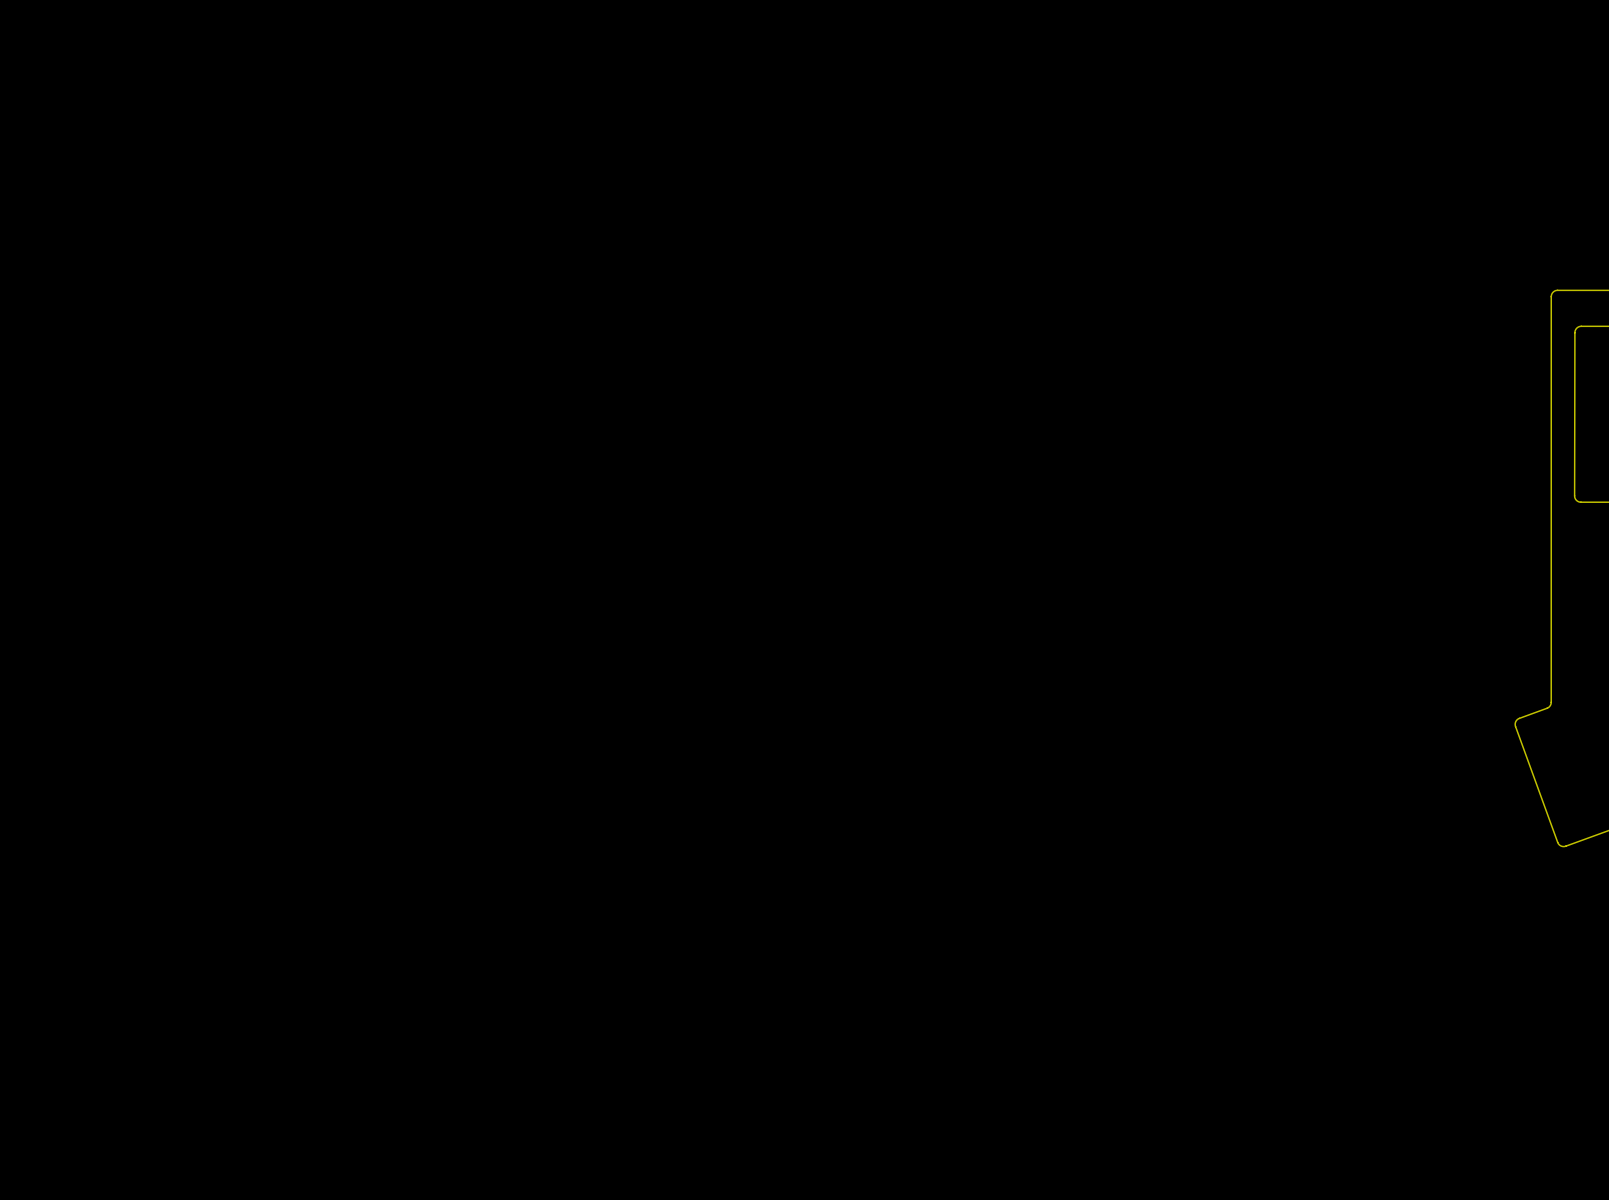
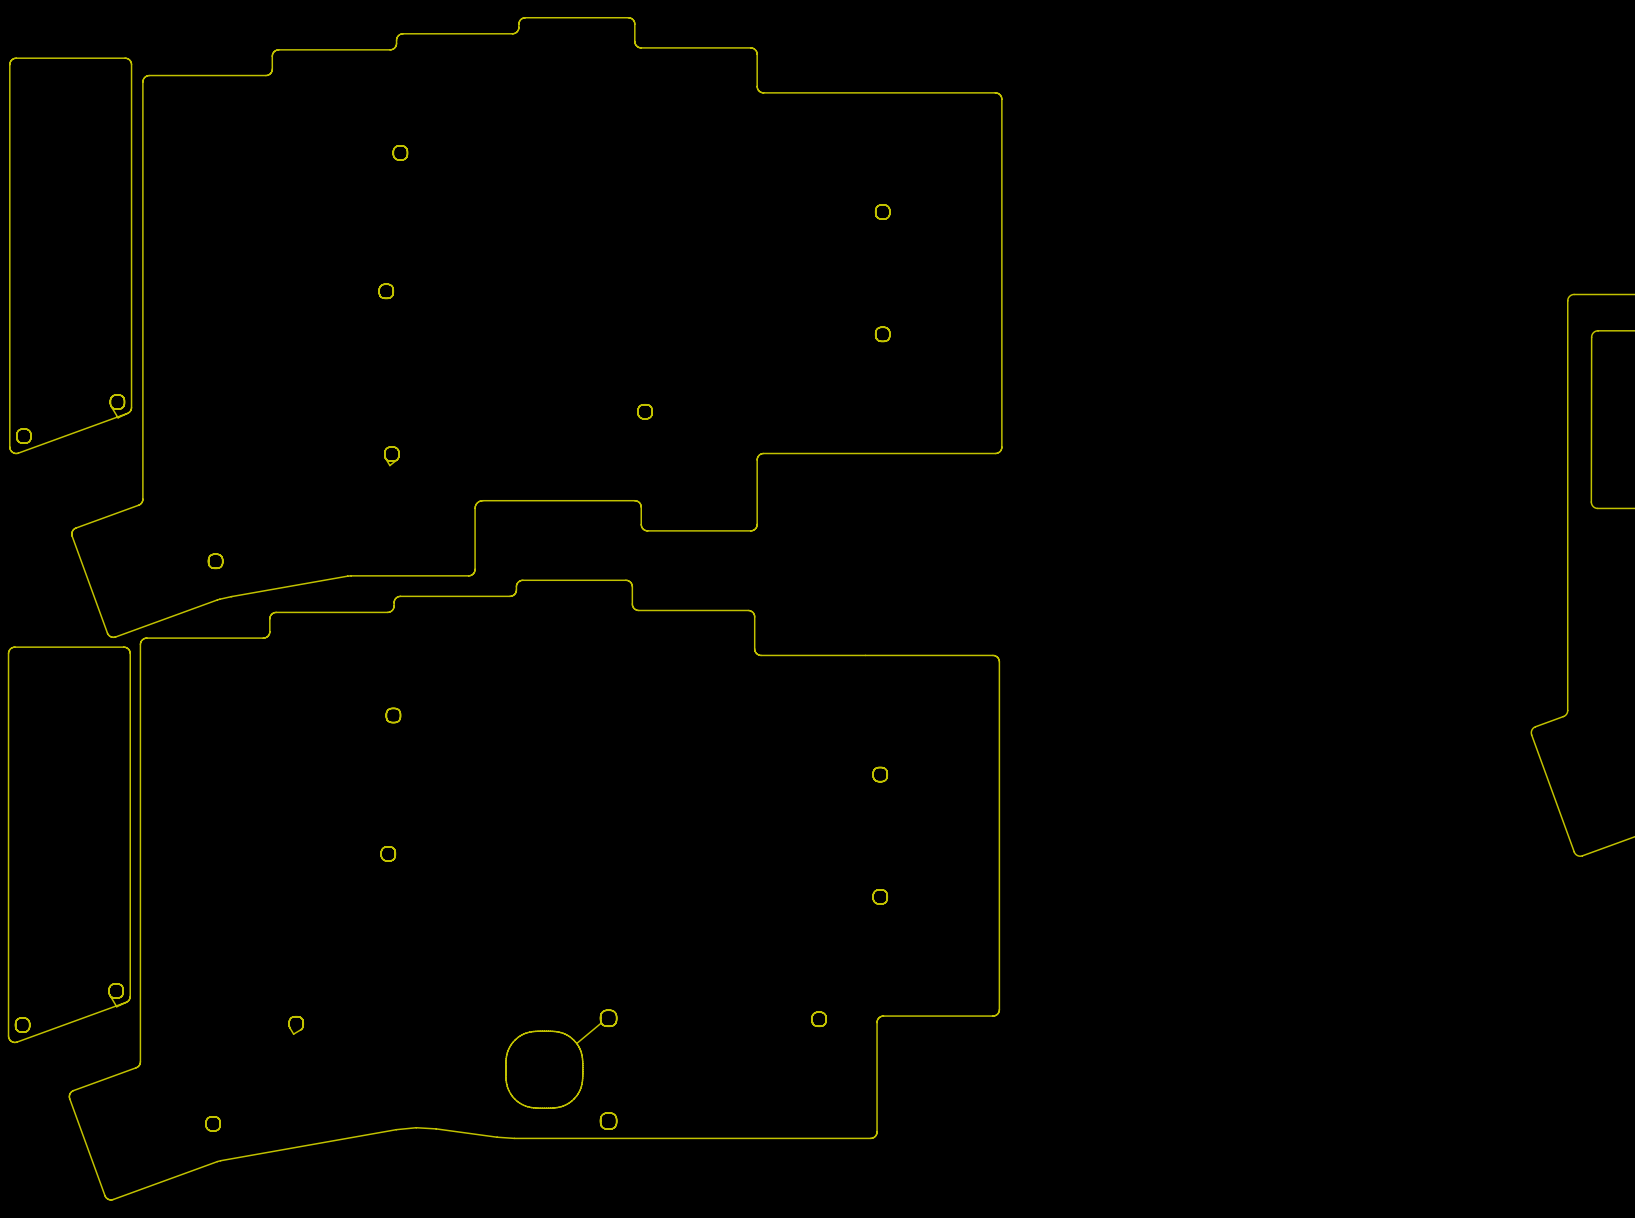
board edge: none -> (525, 17) (629, 17) (634, 21) (634, 42) (639, 47) (753, 48) (757, 53) (757, 87) (762, 92) (995, 92) (999, 94) (1001, 99) (1000, 450) (995, 453) (761, 453) (757, 459) (757, 525) (750, 530) (646, 530) (641, 525) (640, 504) (635, 500) (481, 500) (475, 506) (475, 569) (471, 575) (347, 576) (219, 599) (115, 636) (109, 636) (71, 534) (75, 528) (138, 505) (142, 500) (143, 78) (149, 75) (267, 75) (271, 71) (272, 55) (277, 49) (391, 49) (396, 45) (397, 36) (401, 33) (513, 33) (518, 30) (520, 20) (525, 17)
board edge: none -> (393, 156) (393, 150) (395, 146) (402, 145) (406, 148) (407, 155) (405, 158) (398, 159) (394, 157)
board edge: none -> (876, 215) (875, 209) (878, 205) (885, 205) (888, 207) (889, 214) (887, 217) (880, 218) (876, 216)
board edge: none -> (379, 295) (379, 288) (381, 285) (388, 284) (392, 286) (393, 293) (391, 297) (383, 298) (380, 295)
board edge: none -> (876, 338) (875, 331) (878, 328) (885, 327) (888, 329) (889, 336) (887, 340) (880, 341) (876, 338)
board edge: none -> (110, 405) (111, 406) (118, 417) (128, 413) (131, 408) (131, 63) (125, 58) (14, 58) (9, 64) (10, 449) (13, 452) (18, 453) (127, 413)
board edge: none -> (110, 405) (110, 399) (112, 395) (119, 395) (123, 397) (124, 404) (121, 408) (114, 408) (110, 405)
board edge: none -> (638, 415) (638, 409) (640, 405) (647, 404) (651, 407) (652, 414) (649, 417) (642, 418) (638, 416)
board edge: none -> (17, 439) (17, 433) (19, 429) (26, 429) (30, 431) (30, 438) (28, 442) (21, 443) (17, 440)
board edge: none -> (385, 457) (389, 461) (396, 460)
board edge: none -> (385, 457) (389, 465) (398, 458) (398, 449) (394, 447) (387, 447) (385, 451) (385, 457)
board edge: none -> (209, 565) (208, 558) (211, 555) (217, 554) (221, 556) (222, 563) (220, 567) (213, 568) (209, 565)
board edge: none -> (522, 580) (627, 580) (631, 584) (632, 605) (637, 610) (750, 610) (754, 615) (754, 650) (759, 655) (992, 655) (997, 657) (999, 661) (998, 1012) (992, 1016) (879, 1017) (877, 1022) (877, 1131) (875, 1136) (871, 1138) (514, 1138) (416, 1127) (220, 1160) (113, 1199) (107, 1199) (69, 1096) (73, 1090) (136, 1067) (140, 1062) (141, 641) (146, 638) (264, 638) (269, 633) (269, 617) (275, 612) (388, 612) (392, 609) (394, 600) (399, 596) (511, 596) (515, 593) (517, 582) (522, 580)
board edge: none -> (386, 719) (386, 712) (388, 709) (395, 708) (399, 711) (400, 717) (398, 721) (391, 722) (387, 719)
board edge: none -> (873, 778) (873, 771) (875, 768) (882, 767) (886, 770) (887, 776) (885, 780) (877, 781) (874, 779)
board edge: none -> (381, 857) (381, 851) (383, 847) (390, 846) (394, 849) (395, 856) (393, 859) (385, 860) (382, 858)
board edge: none -> (873, 900) (873, 894) (875, 890) (882, 889) (886, 892) (887, 899) (885, 902) (877, 903) (874, 901)
board edge: none -> (109, 994) (113, 997) (120, 997) (123, 993) (122, 986) (118, 984) (111, 984) (109, 988) (109, 994)
board edge: none -> (109, 994) (109, 995) (116, 1006) (127, 1001) (130, 997) (130, 652) (123, 647) (13, 647) (8, 653) (8, 1038) (12, 1041) (17, 1042) (126, 1002)
board edge: none -> (295, 1016) (291, 1018) (289, 1022) (293, 1034) (301, 1029) (303, 1025) (301, 1018) (295, 1016)
board edge: none -> (601, 1022) (600, 1015) (603, 1011) (611, 1010) (615, 1013) (616, 1020) (614, 1025) (605, 1026) (601, 1023)
board edge: none -> (601, 1022) (576, 1043)
board edge: none -> (812, 1023) (812, 1016) (814, 1013) (821, 1012) (825, 1014) (826, 1021) (823, 1025) (816, 1026) (812, 1023)
board edge: none -> (16, 1028) (15, 1022) (18, 1018) (24, 1018) (28, 1020) (29, 1027) (27, 1030) (20, 1032) (16, 1029)
board edge: none -> (576, 1043) (582, 1057) (582, 1078) (580, 1090) (572, 1100) (559, 1107) (535, 1108) (523, 1105) (513, 1097) (506, 1084) (505, 1062) (508, 1049) (516, 1038) (529, 1032) (552, 1031) (566, 1034) (576, 1043)
board edge: none -> (601, 1125) (600, 1117) (603, 1114) (611, 1113) (615, 1115) (616, 1123) (614, 1127) (605, 1128) (601, 1126)
board edge: none -> (206, 1127) (206, 1121) (208, 1117) (215, 1116) (219, 1119) (220, 1126) (217, 1129) (210, 1130) (206, 1128)

